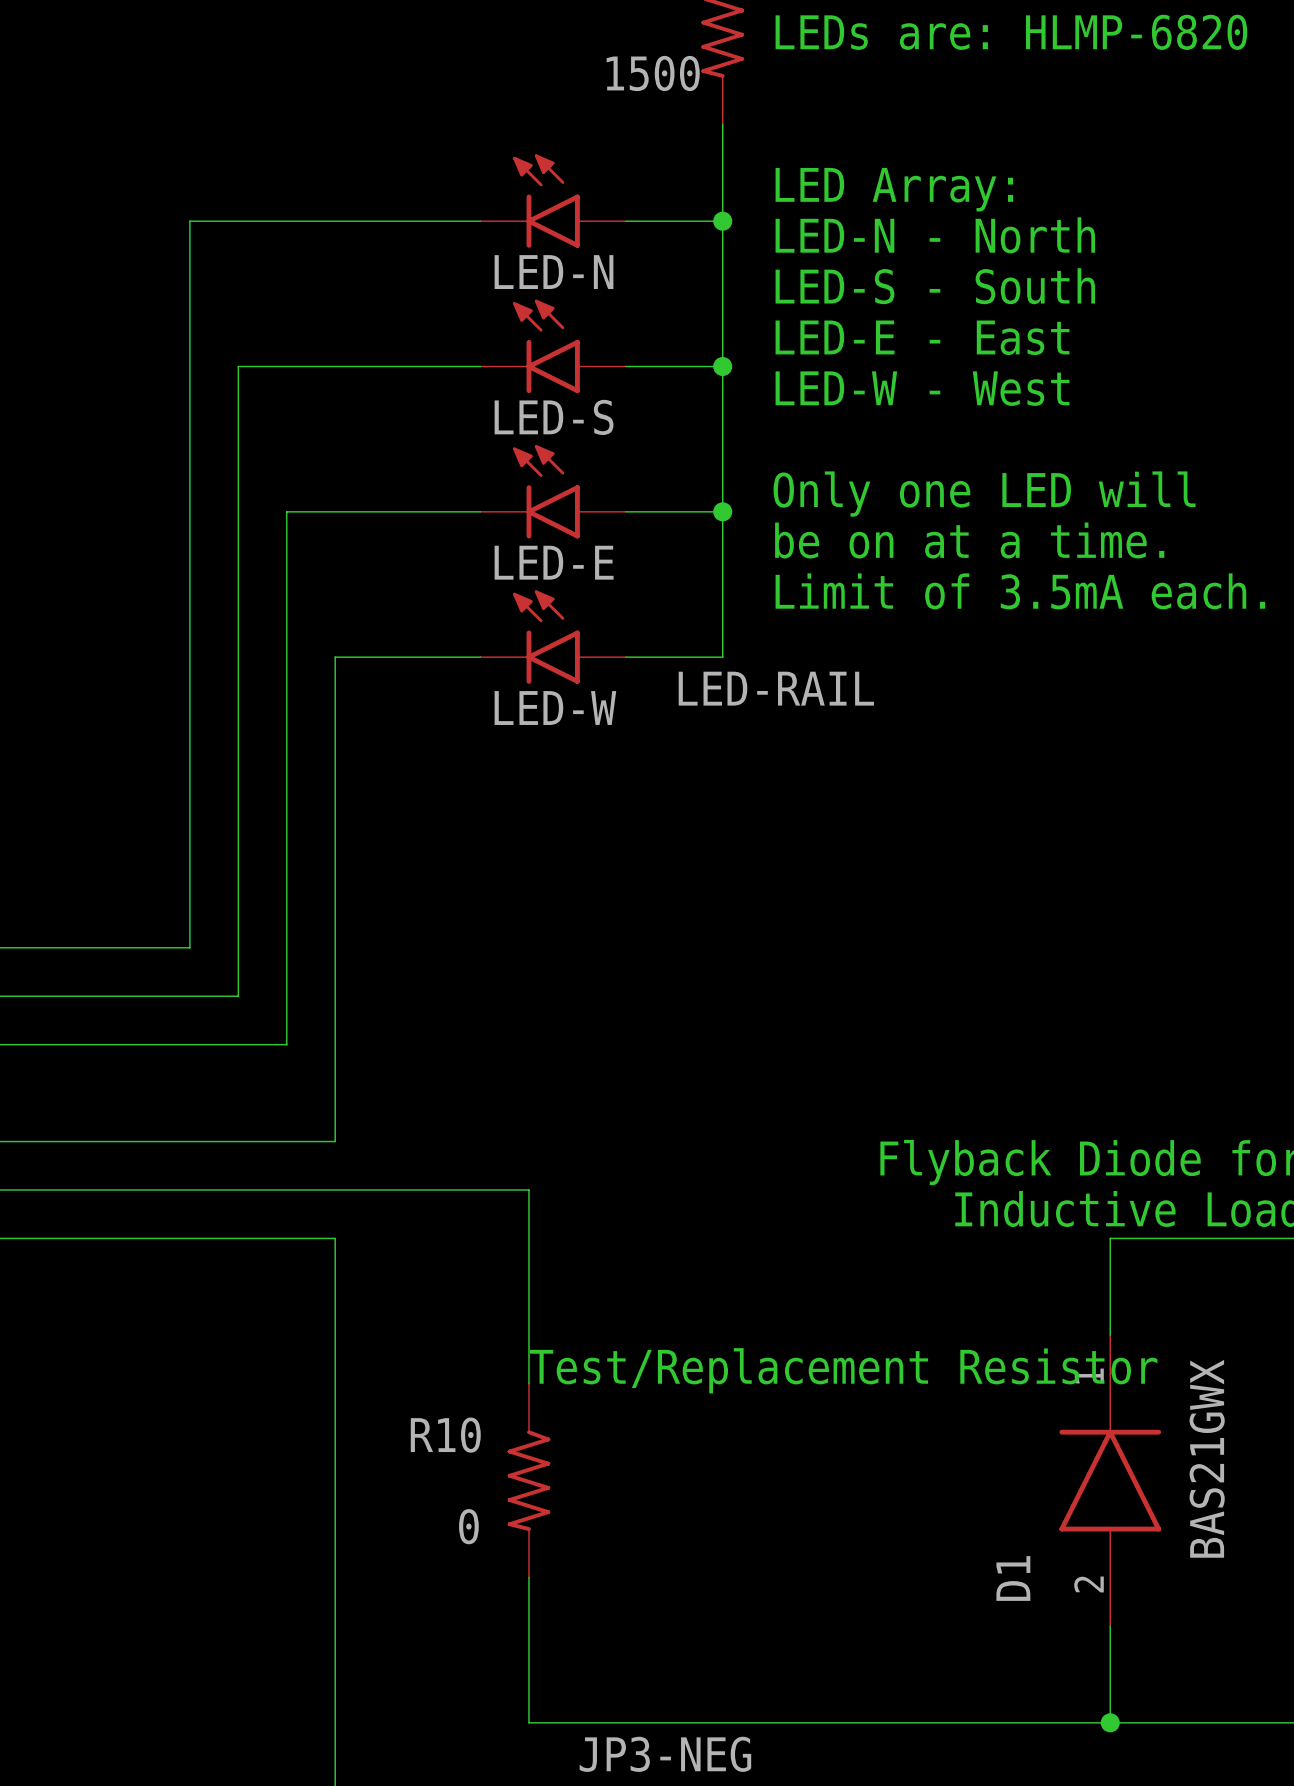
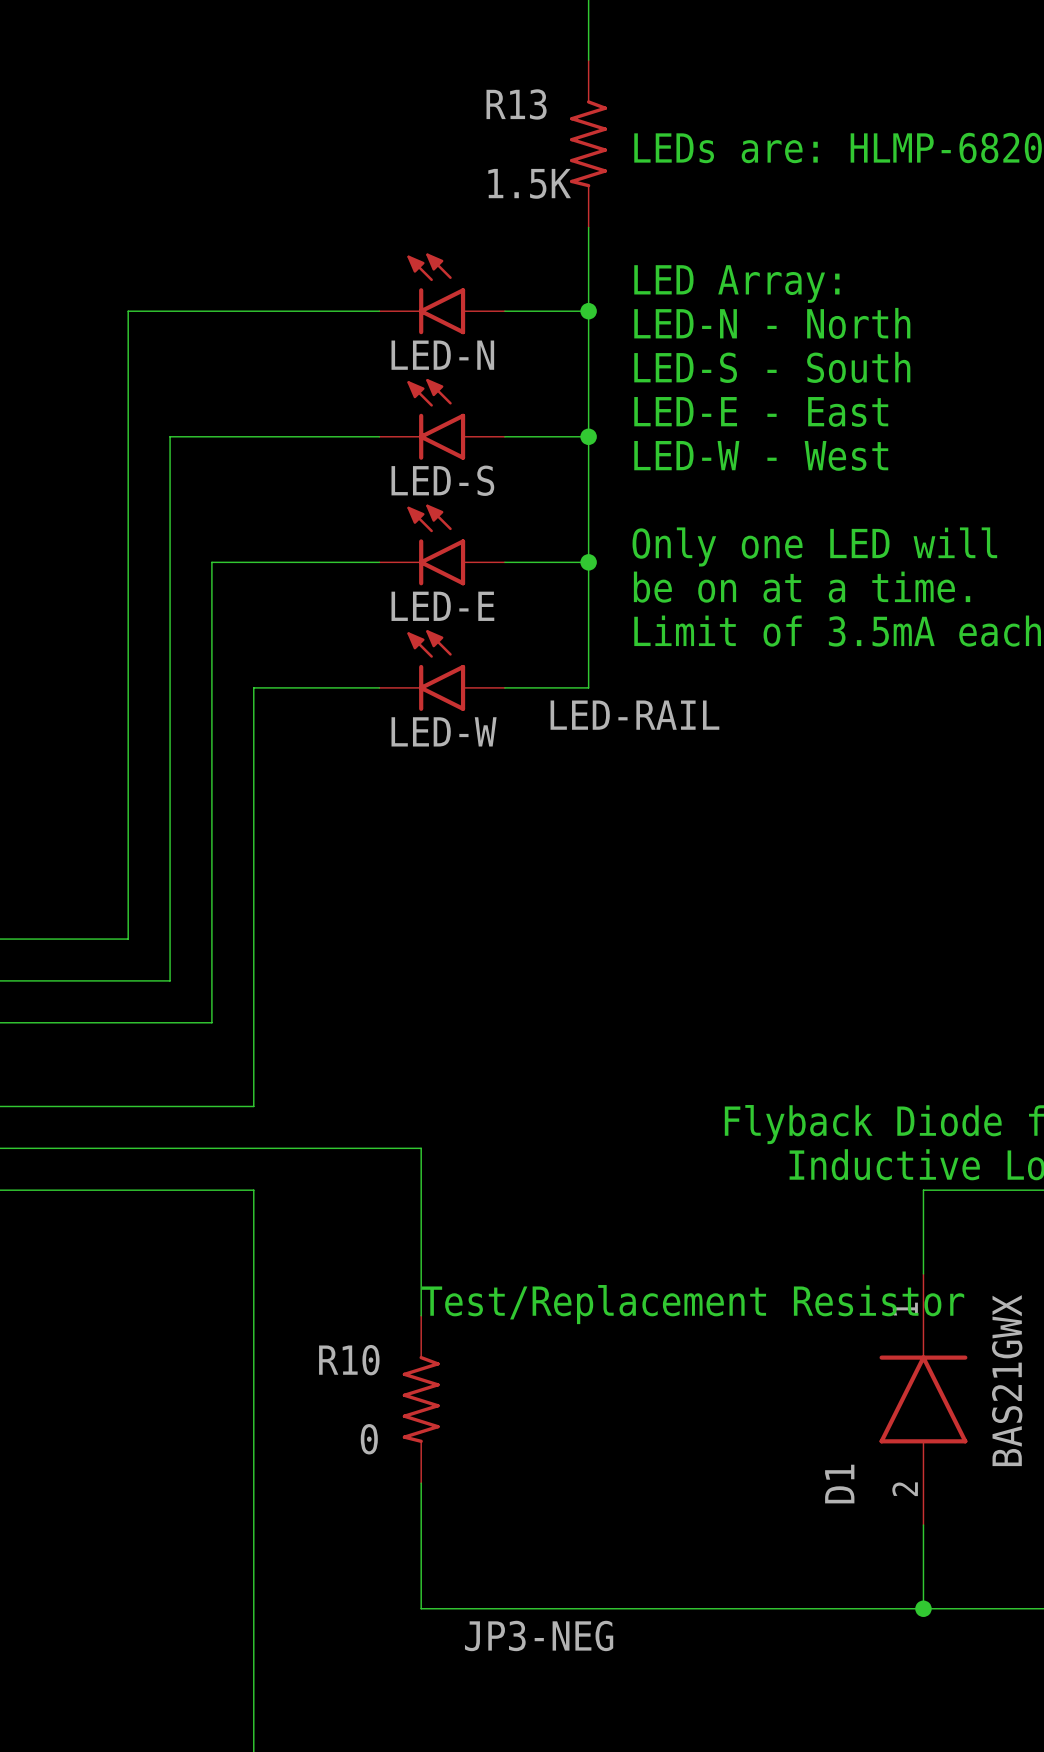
R13 value: 1500 (653, 73) -> 1.5K (529, 183)

